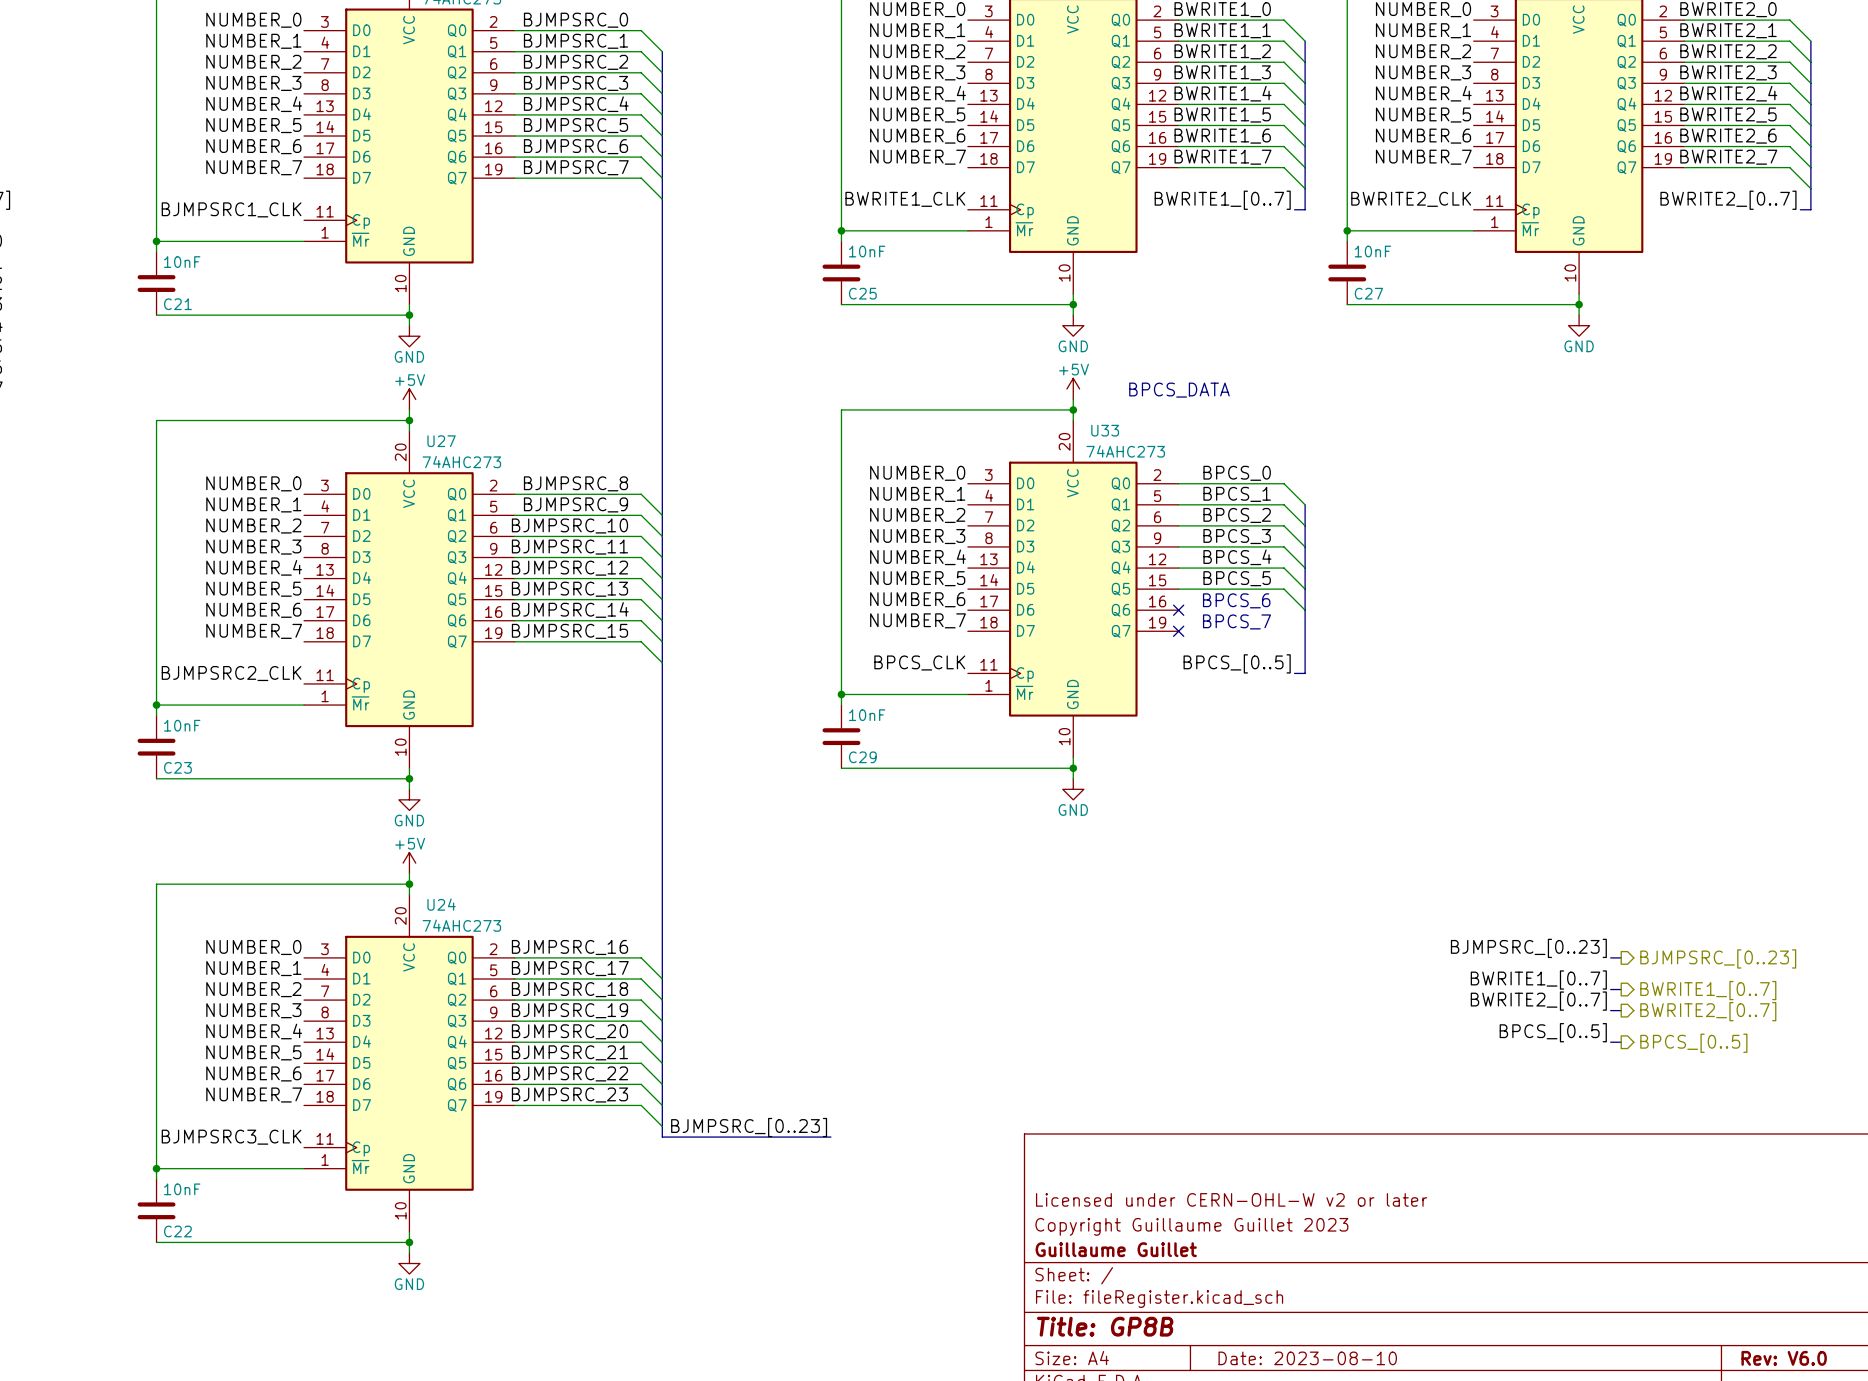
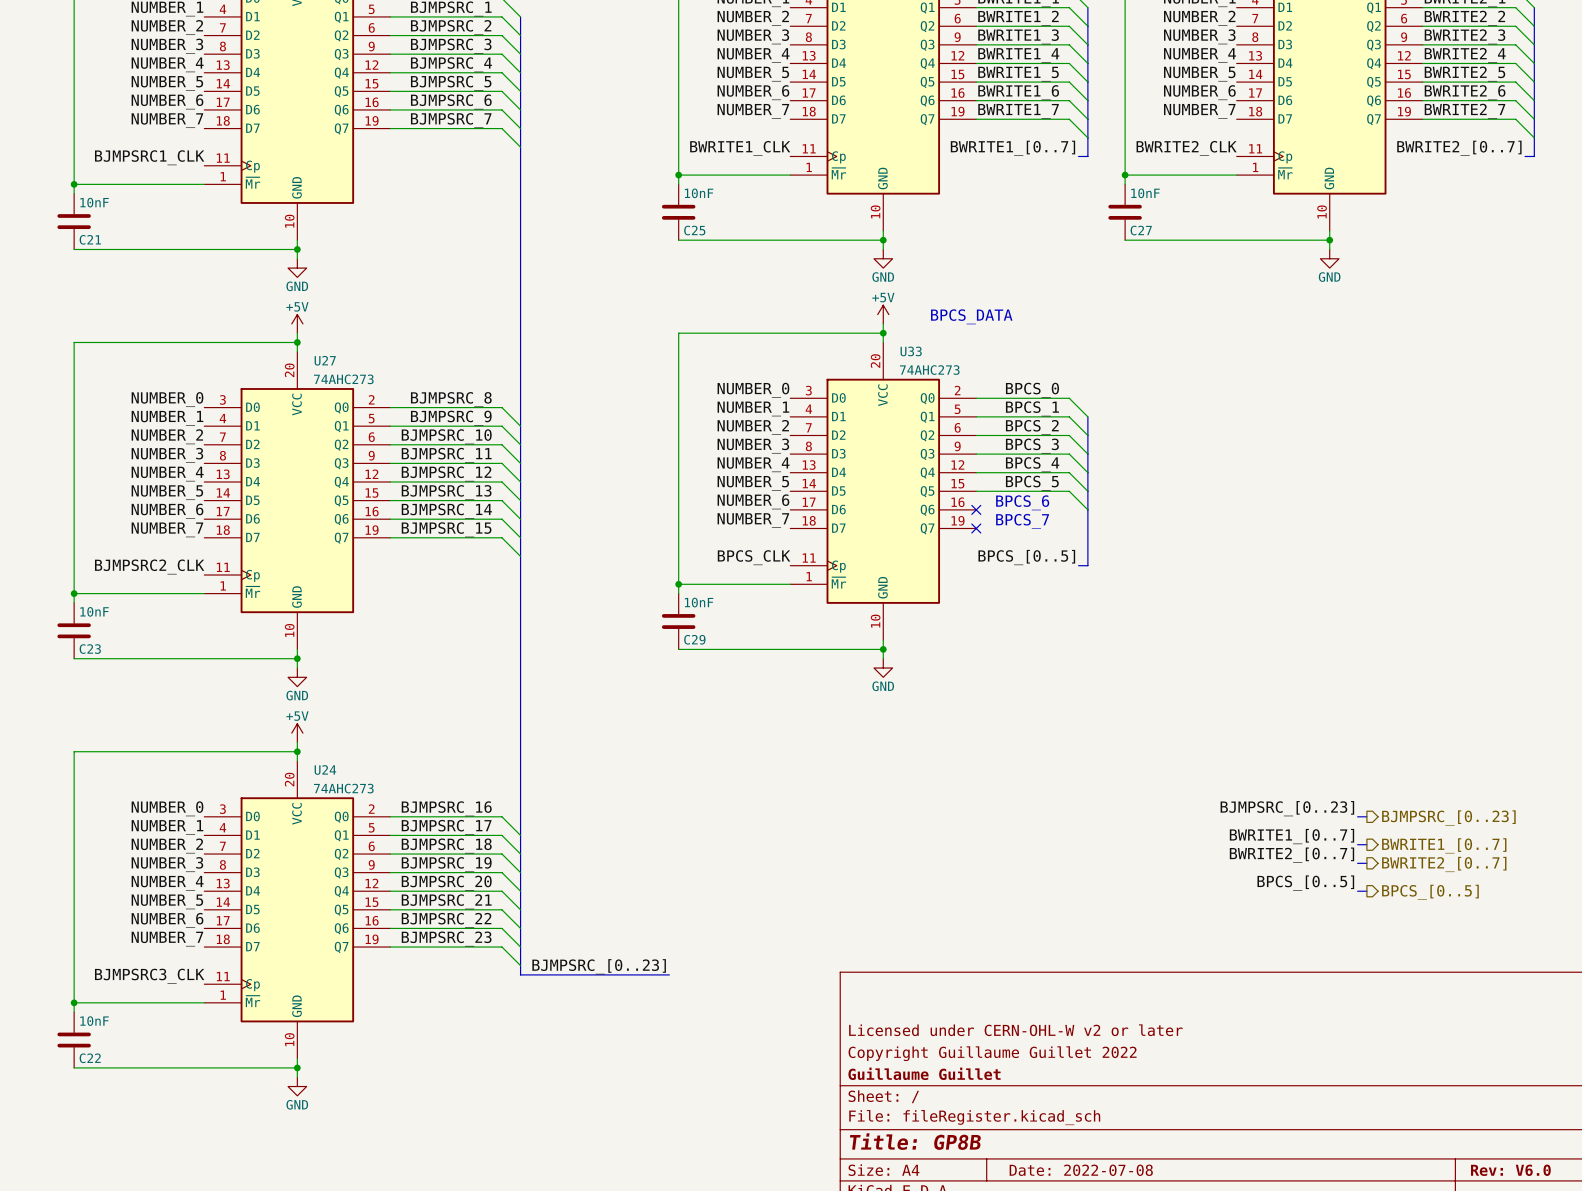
title block: Copyright Guillaume Guillet 2023 (1191, 1226) -> Copyright Guillaume Guillet 2022 (992, 1053)
title block: Date: 2023-08-10 (1307, 1358) -> Date: 2022-07-08 (1081, 1170)

